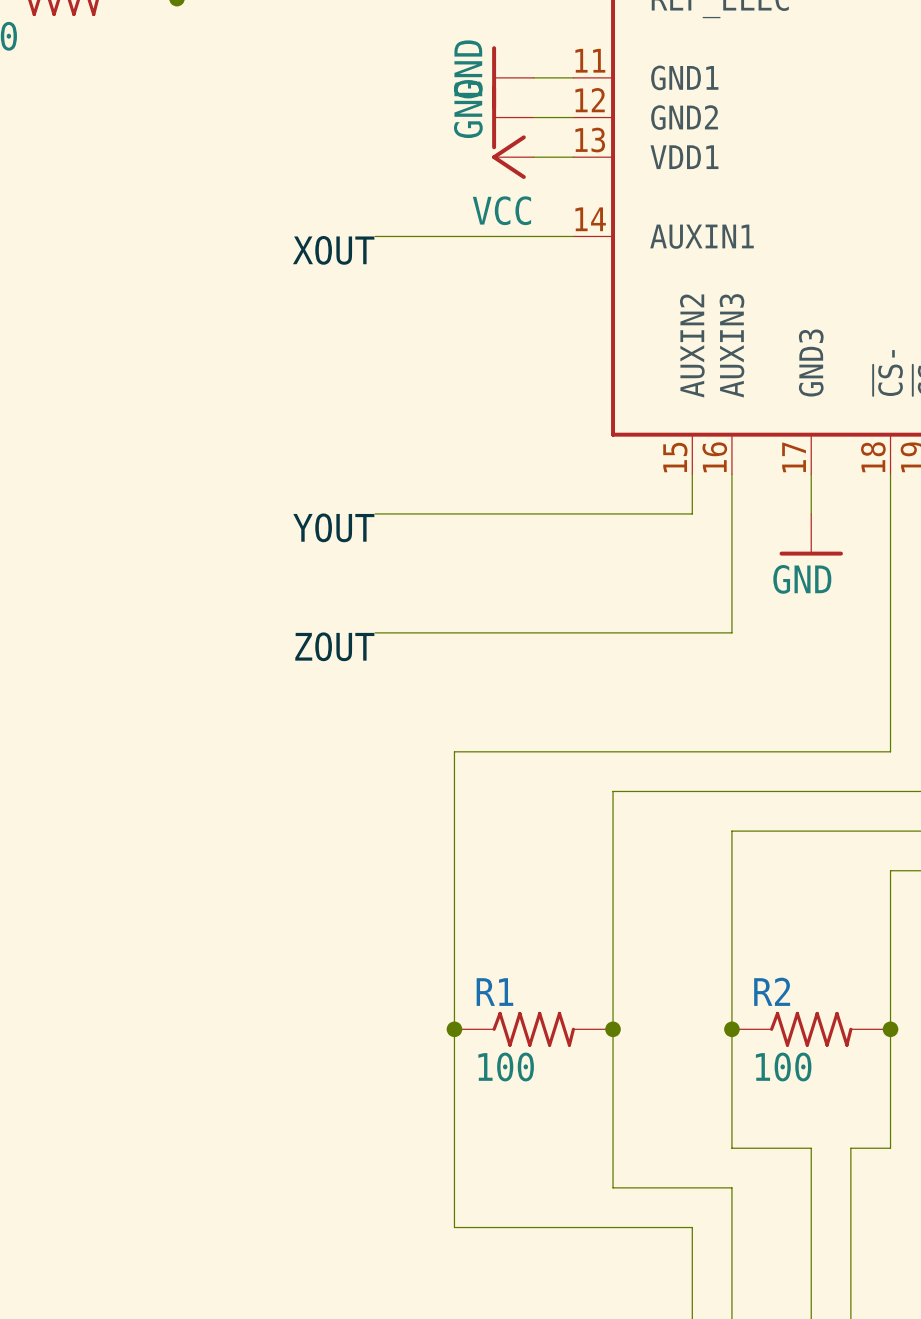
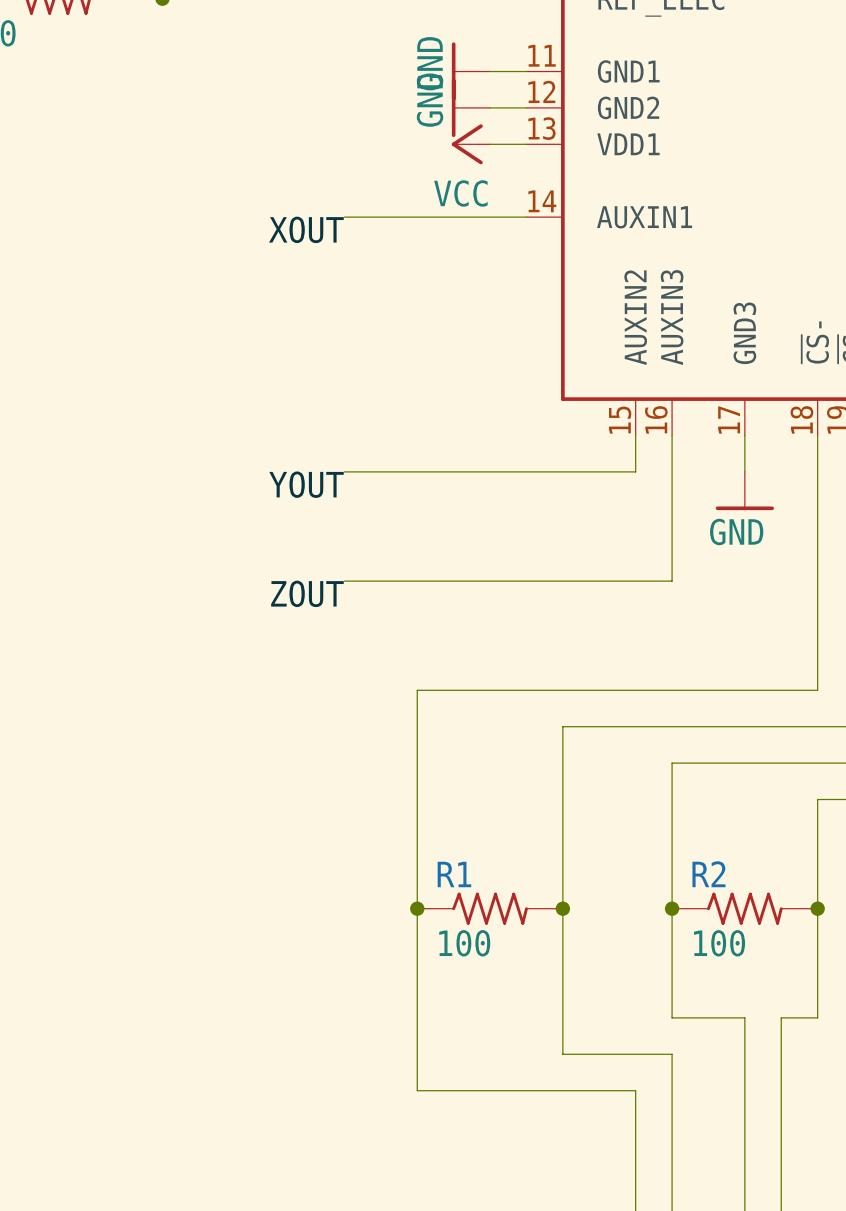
junction position: (454, 1029) -> (417, 908)
R1 position: (533, 1029) -> (490, 908)
junction position: (613, 1029) -> (562, 908)
junction position: (731, 1029) -> (672, 908)
R2 position: (811, 1029) -> (744, 908)
junction position: (890, 1029) -> (817, 908)
wire: (731, 1108) (731, 1148) (811, 1148) -> (672, 1017) (744, 1017) (744, 1054)
wire: (890, 1108) (890, 1148) (850, 1148) -> (817, 1017) (781, 1017) (781, 1054)
wire: (613, 1148) (613, 1187) -> (562, 1054) (672, 1054) (672, 1090)
wire: (454, 1187) (454, 1227) (692, 1227) -> (417, 1090) (562, 1090)
wire: (692, 1187) (731, 1187) -> (635, 1090) (635, 1127)

